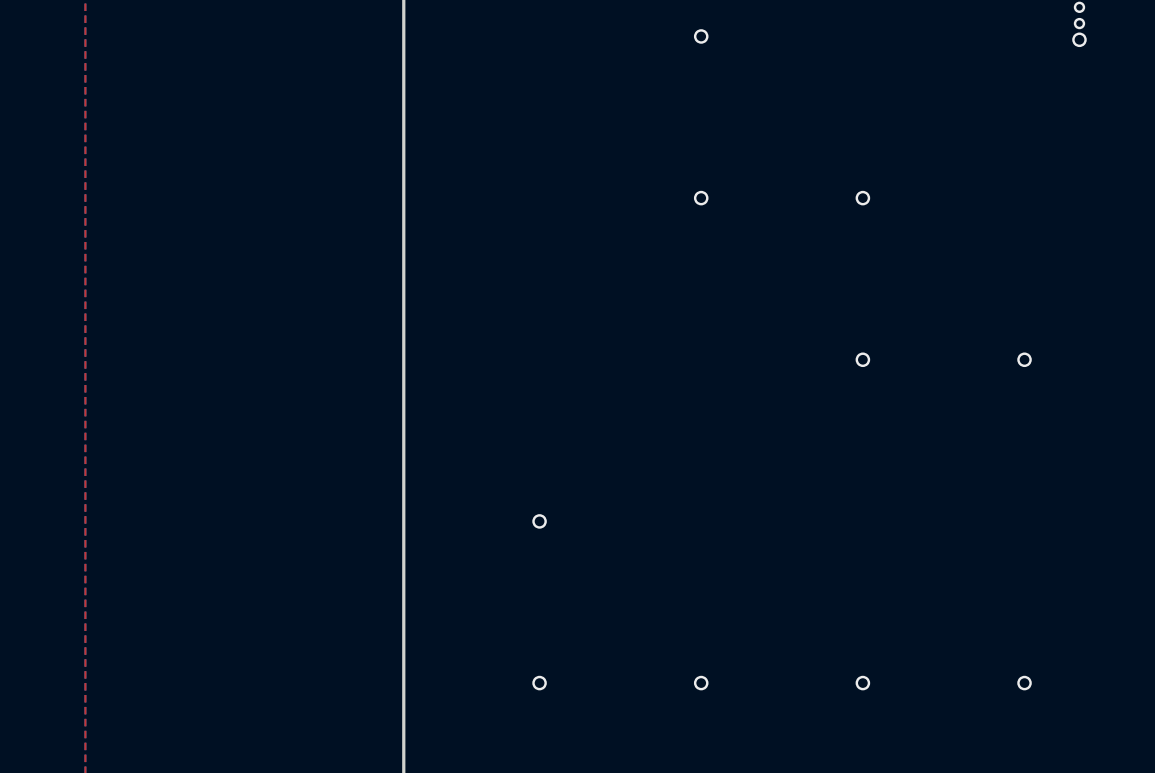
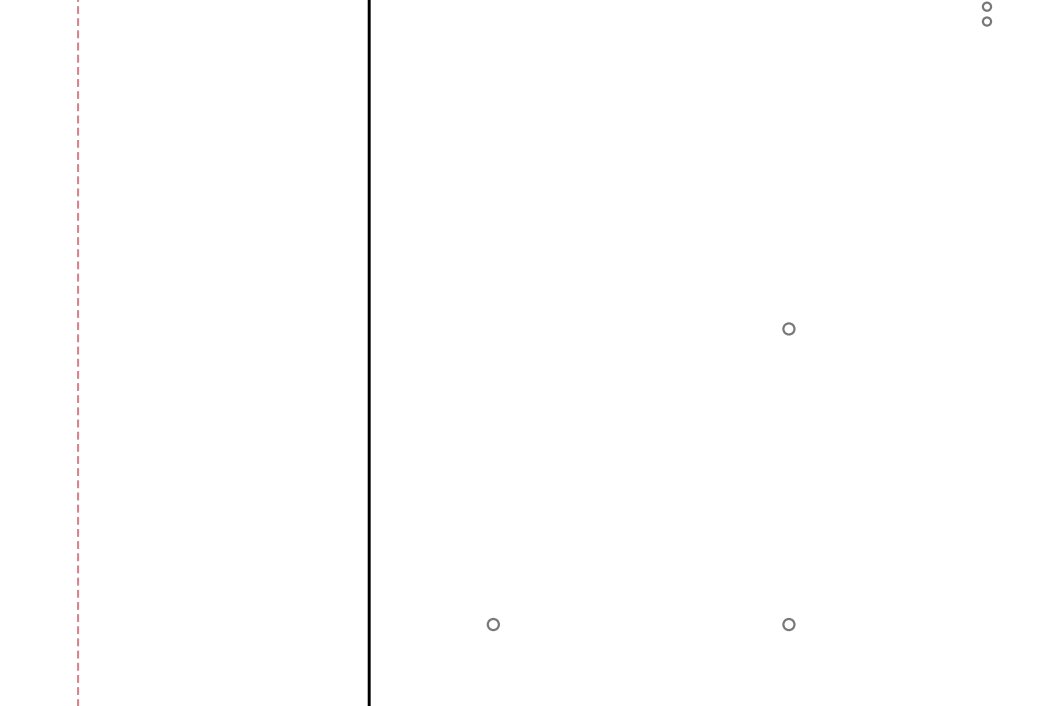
via: (701, 36) -> none
via: (1079, 39) -> none
via: (701, 198) -> none
via: (862, 198) -> none
via: (1024, 359) -> none
via: (539, 521) -> none
via: (701, 683) -> none
via: (1024, 683) -> none

